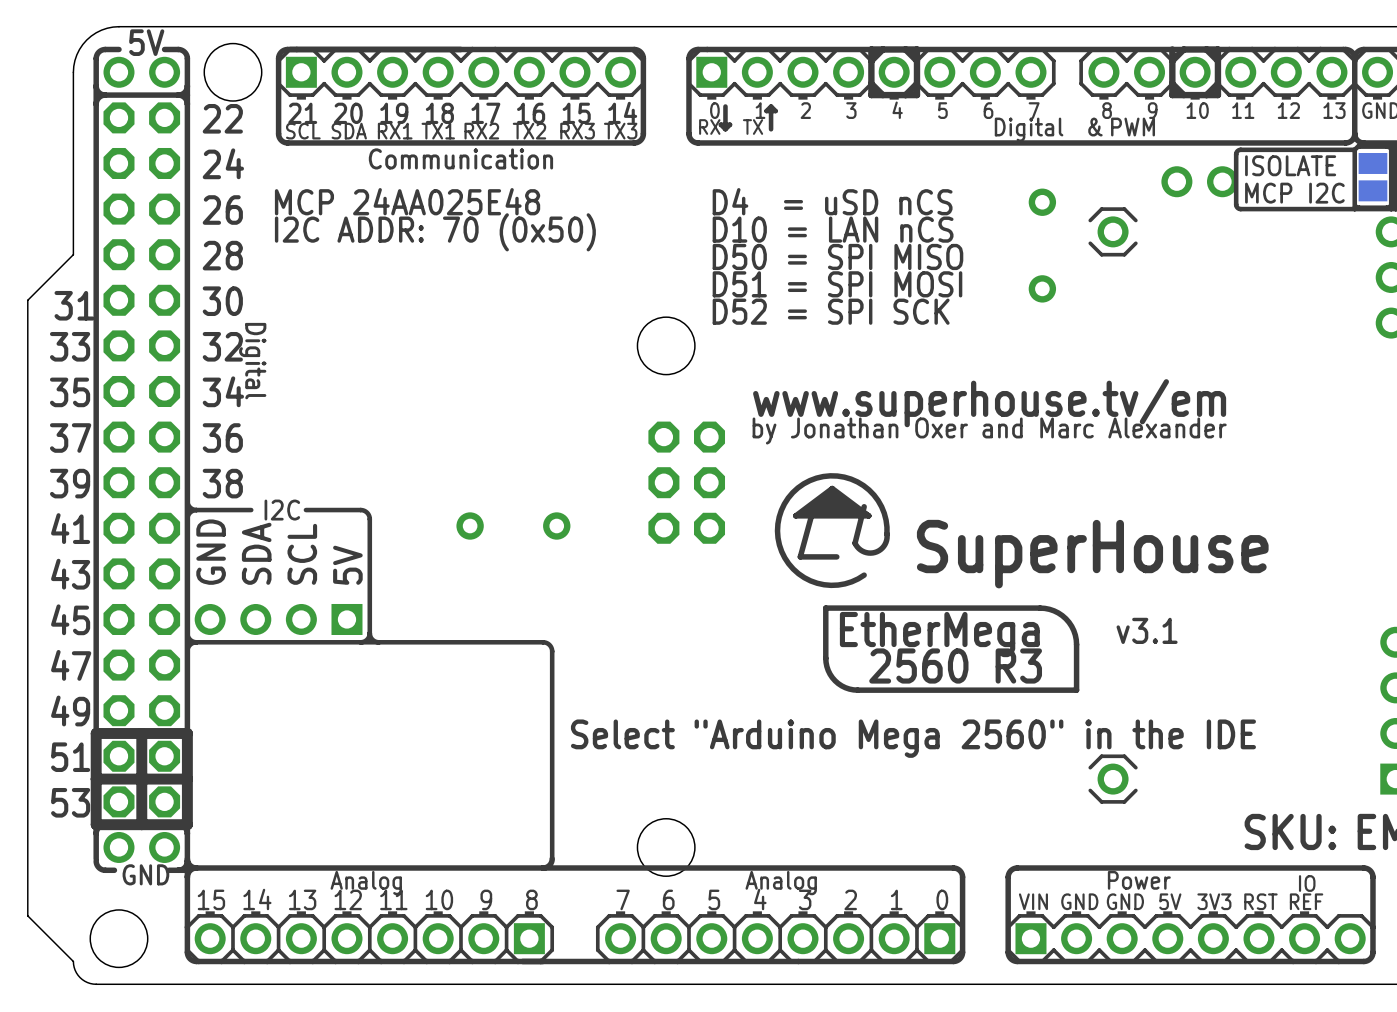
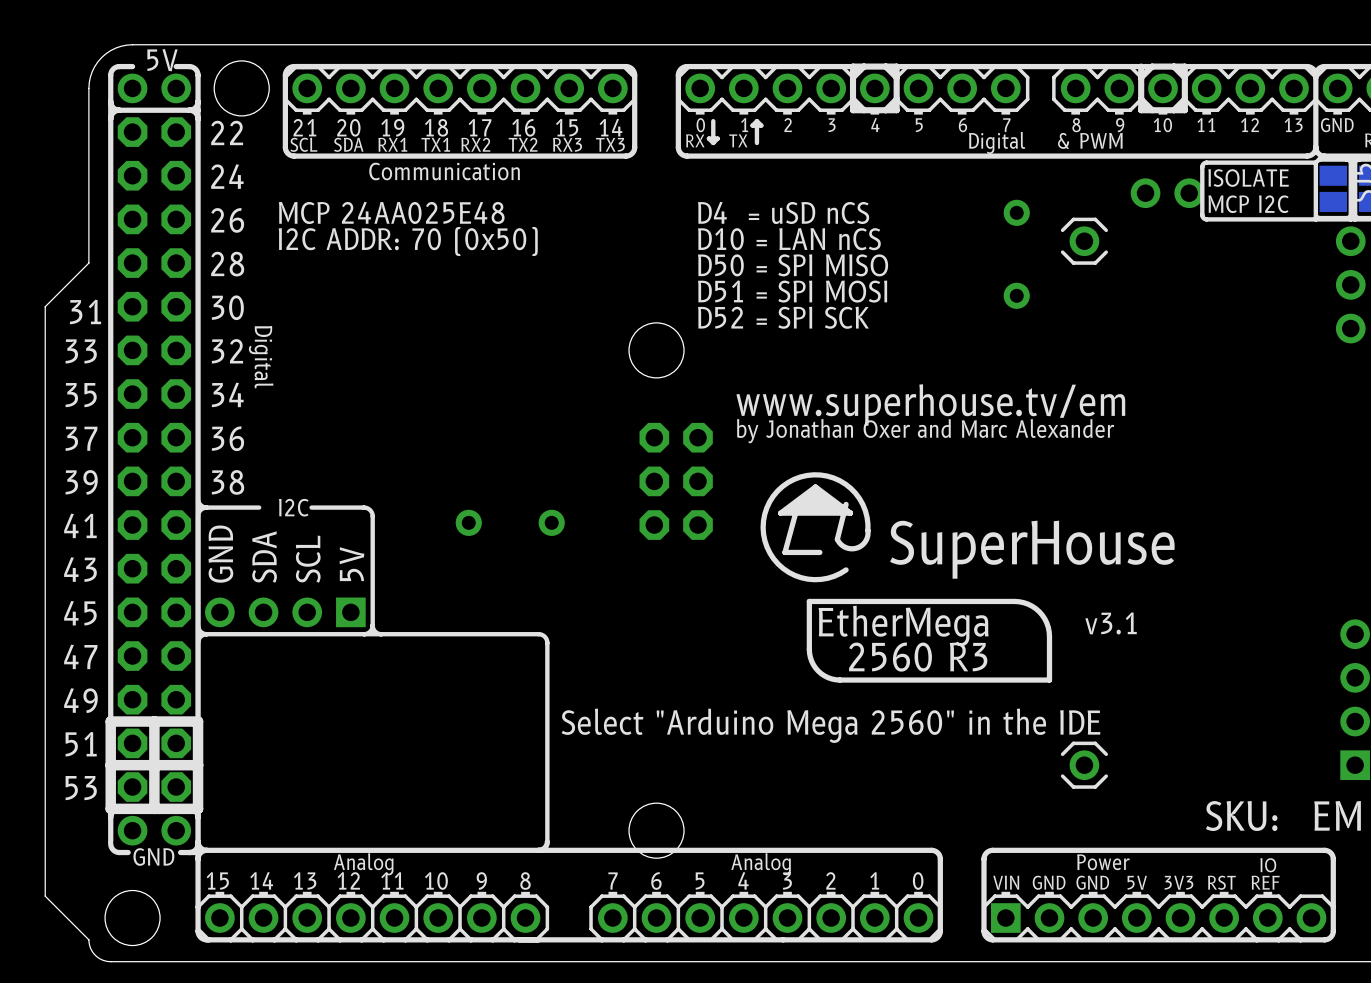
part footprint: [285, 56, 637, 88] -> [292, 73, 628, 104]
part footprint: [696, 56, 1047, 88] -> [685, 73, 1021, 104]
part footprint: [194, 923, 545, 955] -> [205, 903, 541, 933]
part footprint: [605, 923, 956, 955] -> [598, 903, 934, 933]

